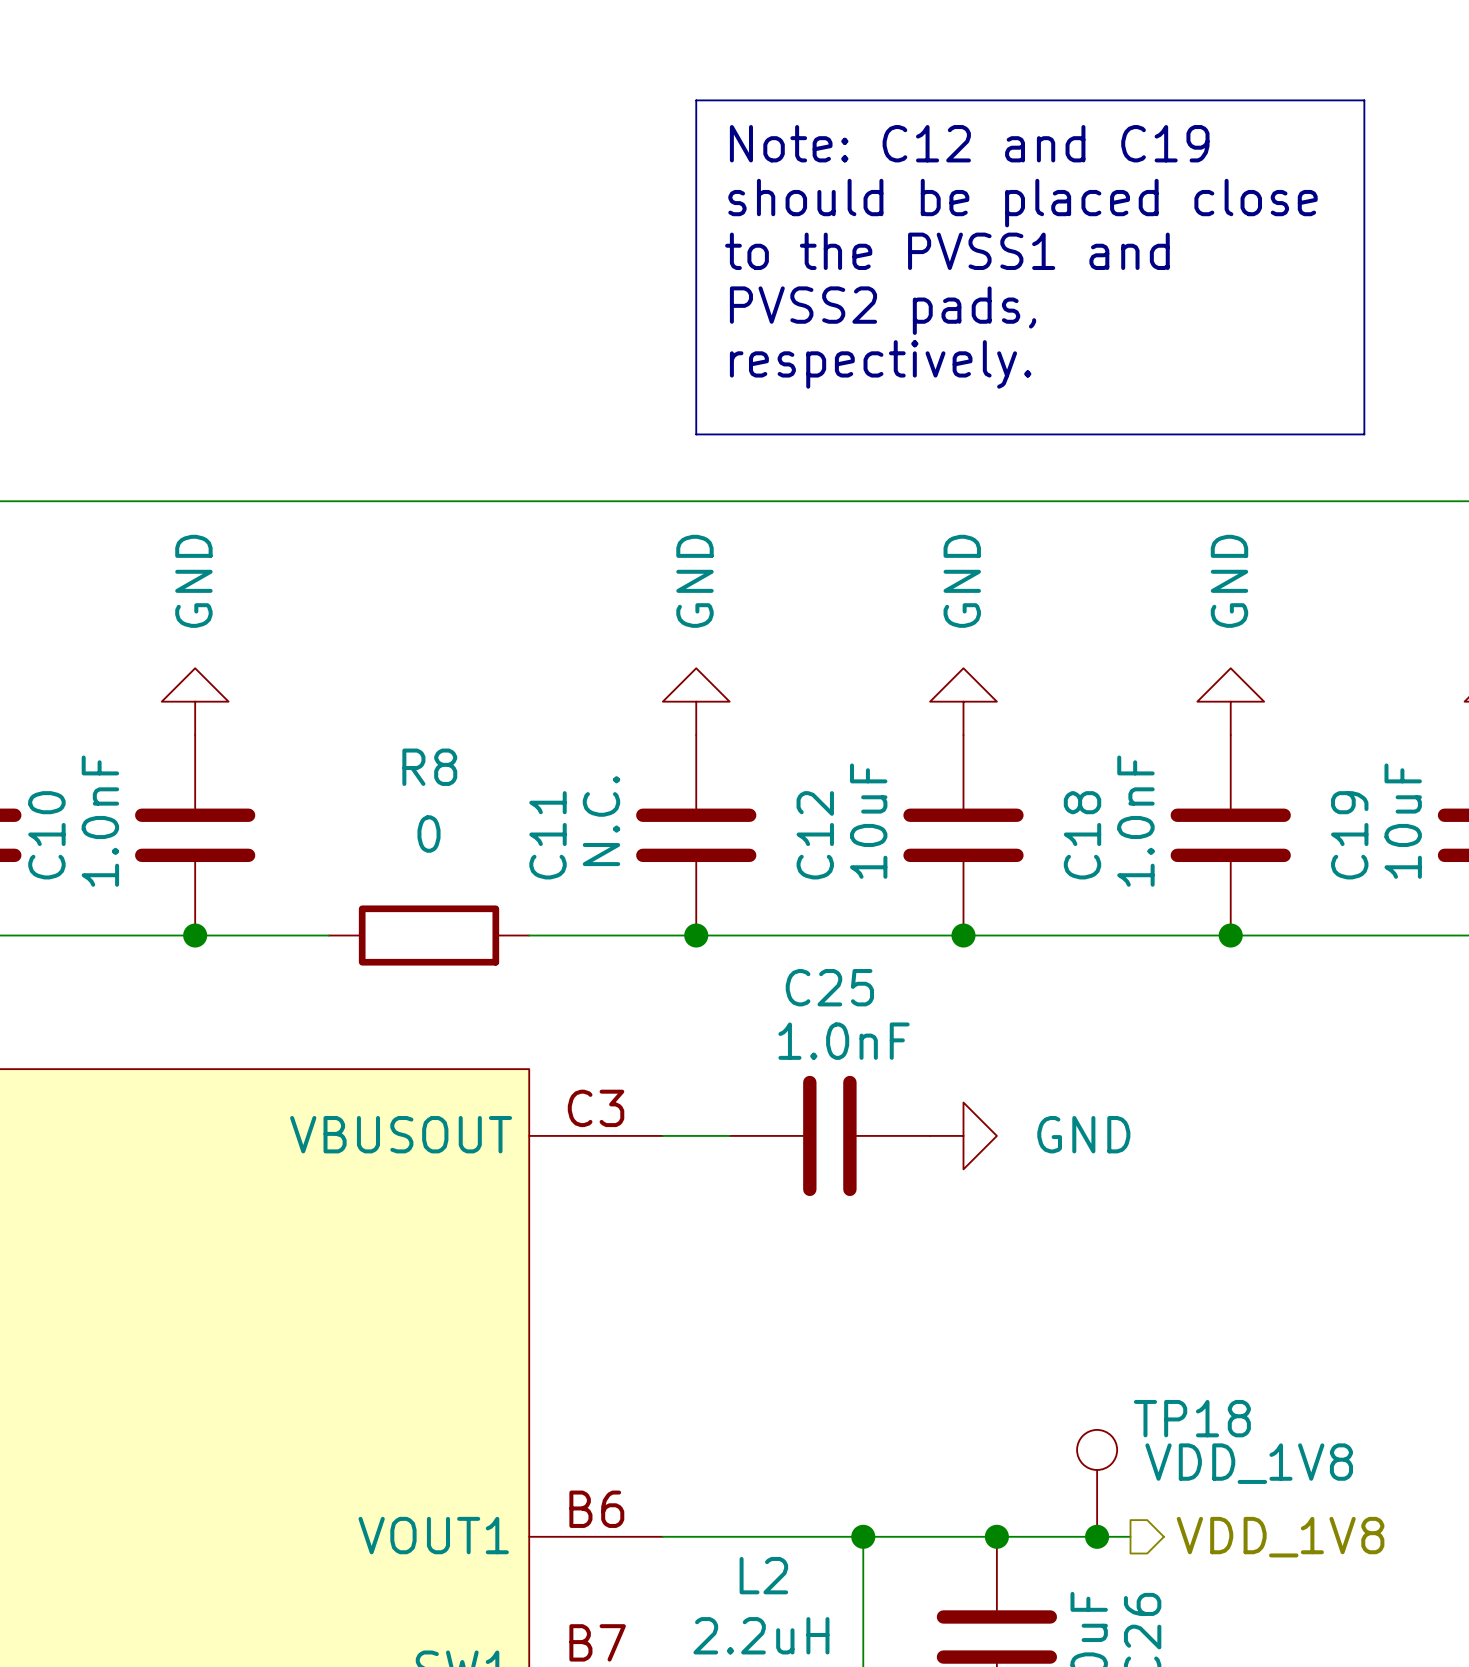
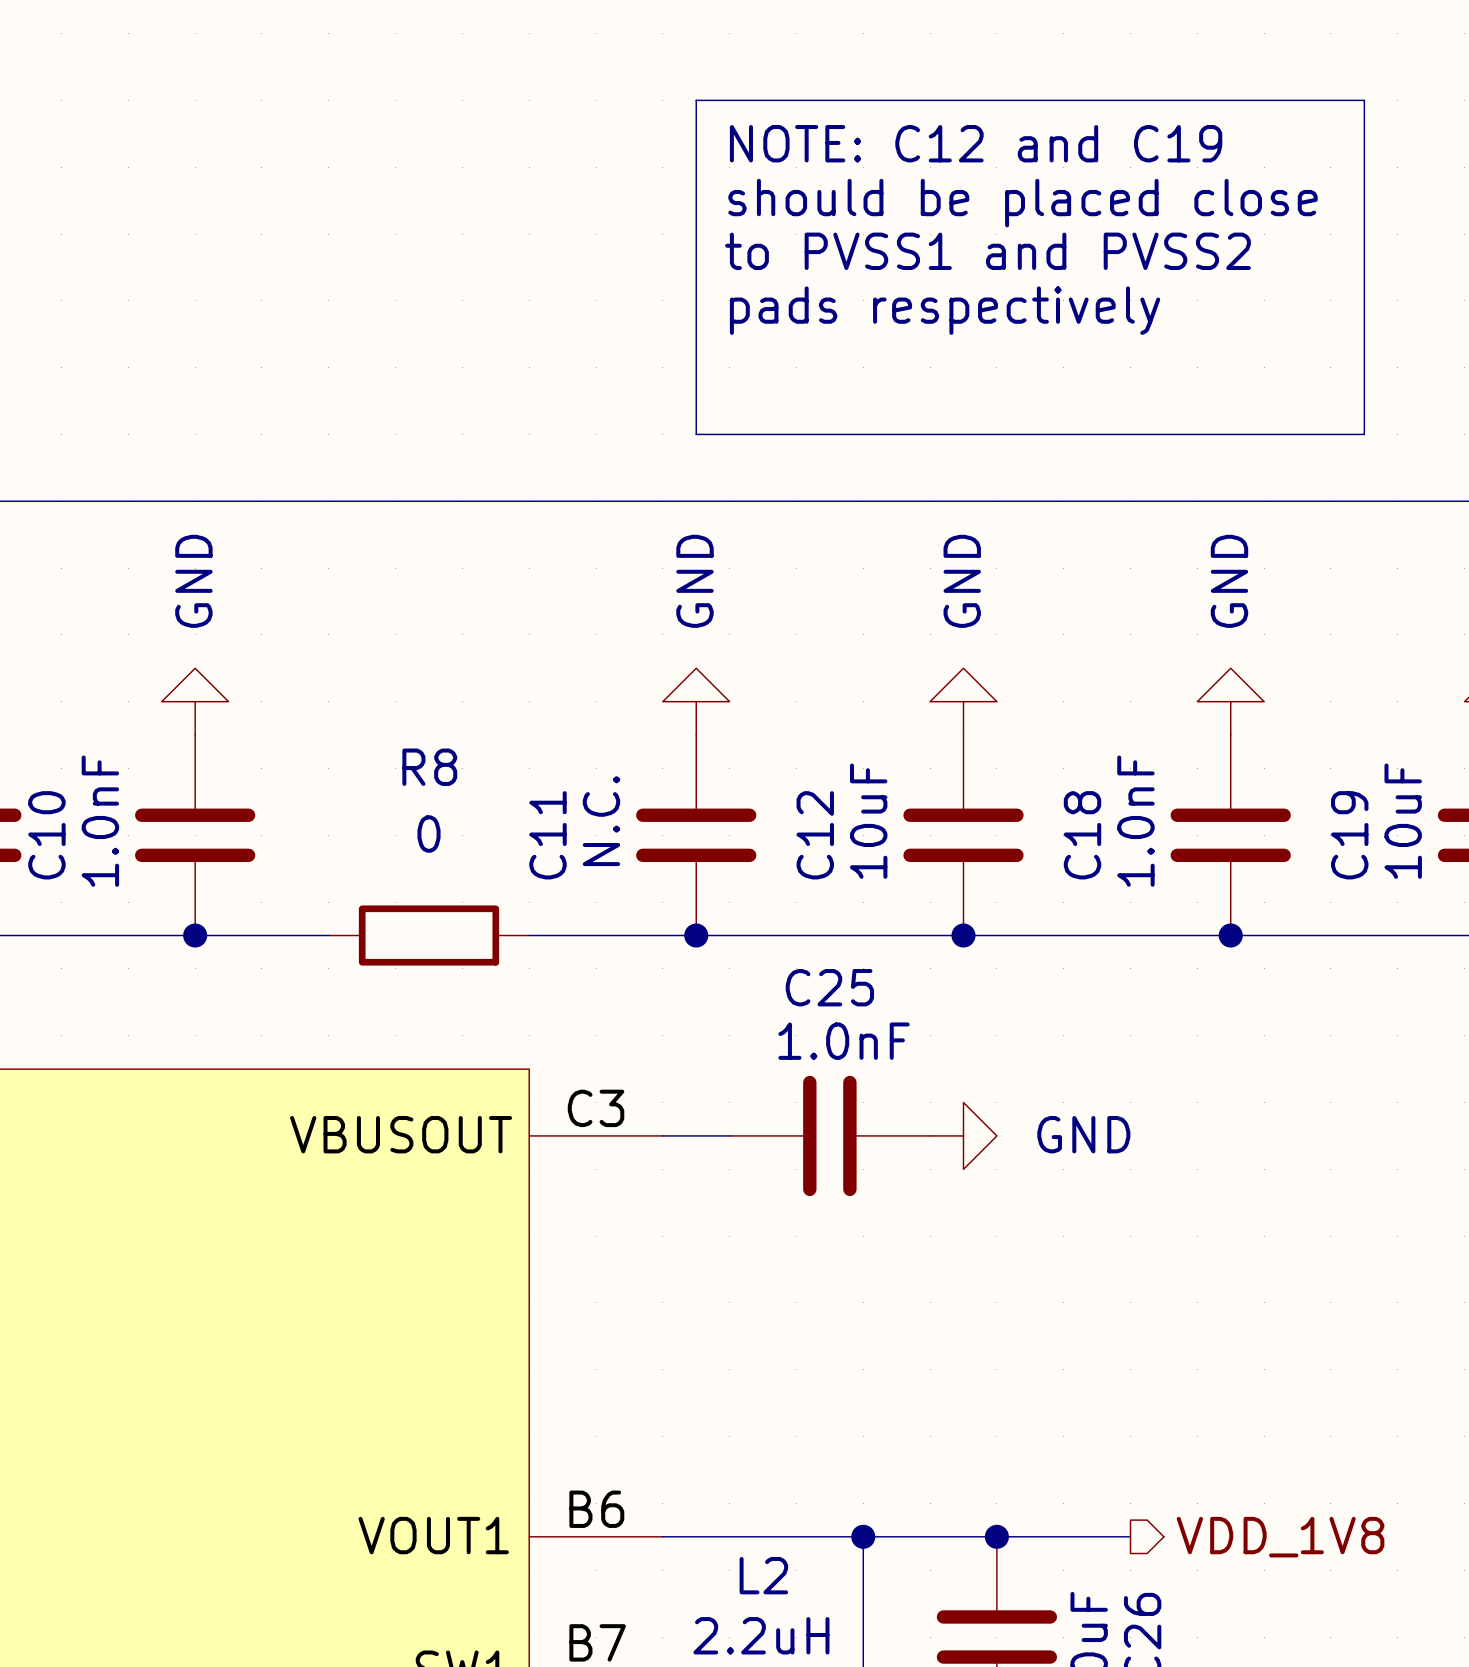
text: Note: C12 and C19 (969, 143) -> NOTE: C12 and C19 (976, 143)
text: to the PVSS1 and (947, 251) -> to PVSS1 and PVSS2 (988, 251)
text: PVSS2 pads, (883, 310) -> pads respectively (945, 310)
text: respectively. (880, 364) -> none
TP18: VDD_1V8 (1097, 1483) -> none
junction: (1097, 1536) -> none

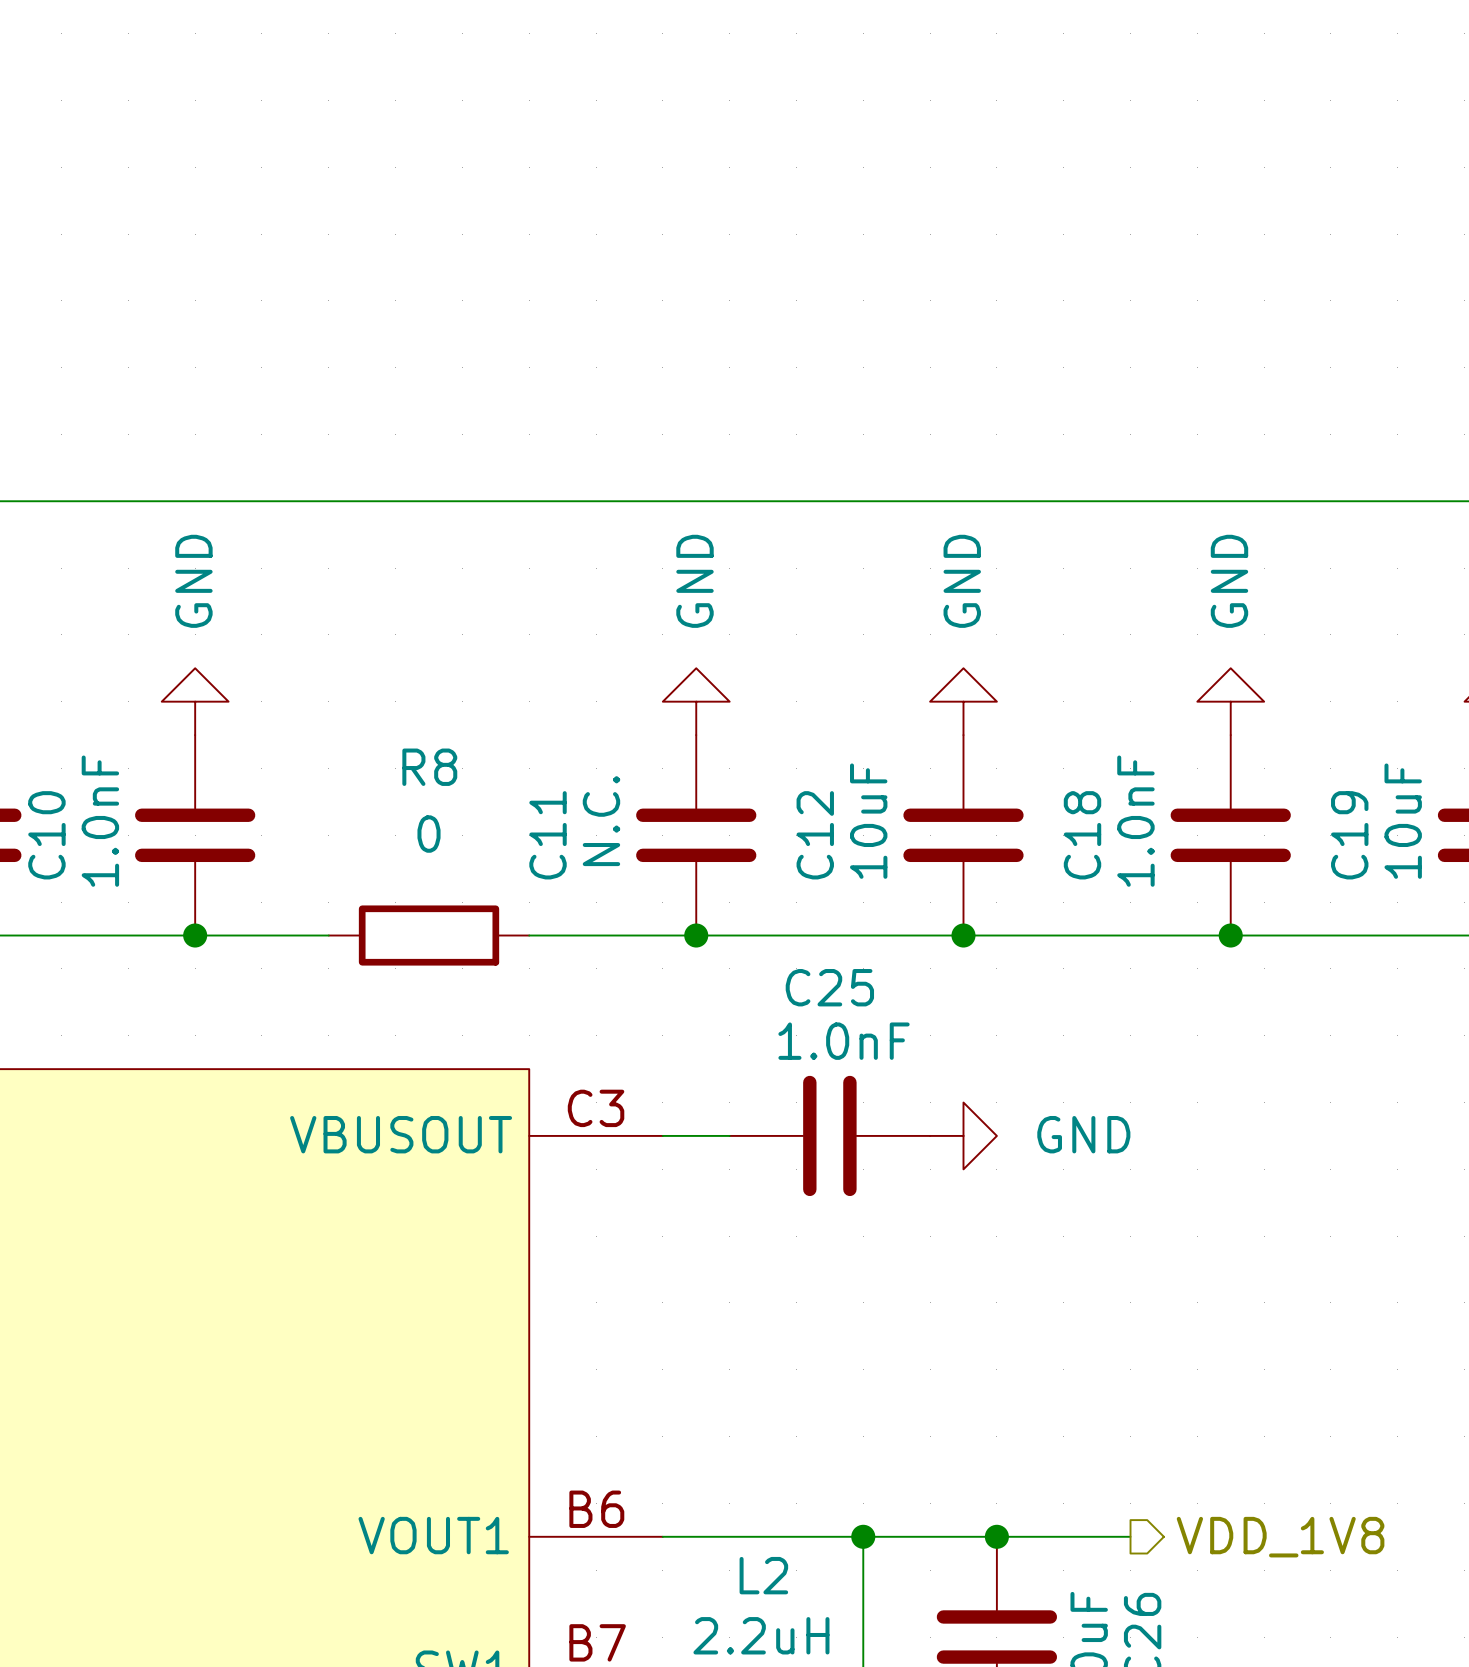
line: (696, 100) (1364, 100) (1364, 434) (696, 434) (696, 100) -> none
text: NOTE: C12 and C19 (976, 143) -> none
text: should be placed close (1022, 203) -> none
text: to PVSS1 and PVSS2 (988, 251) -> none
text: pads respectively (945, 310) -> none

